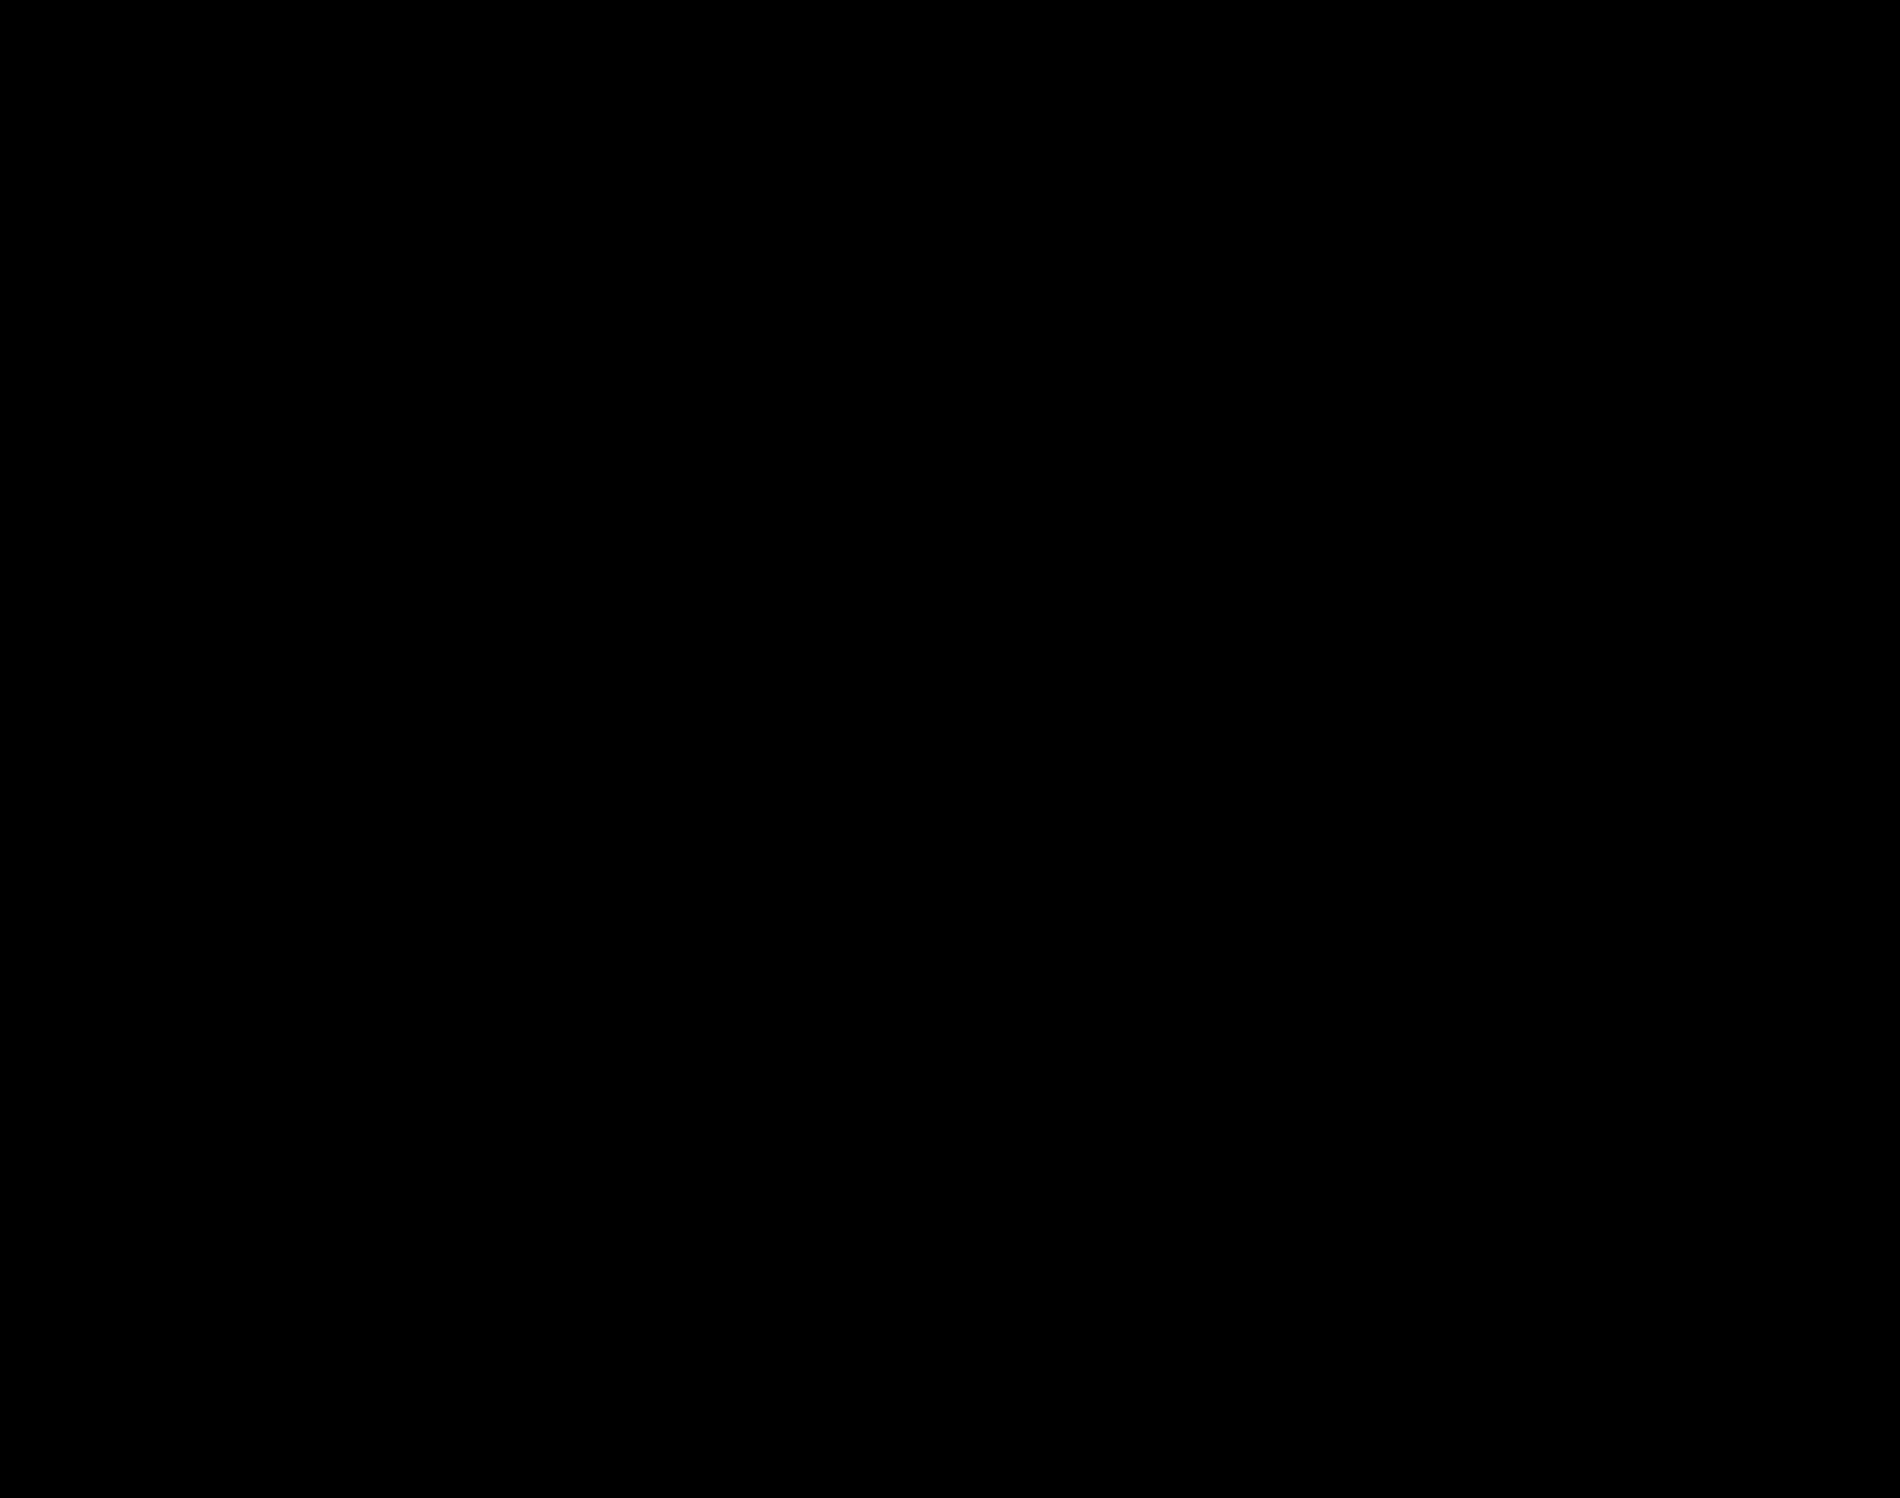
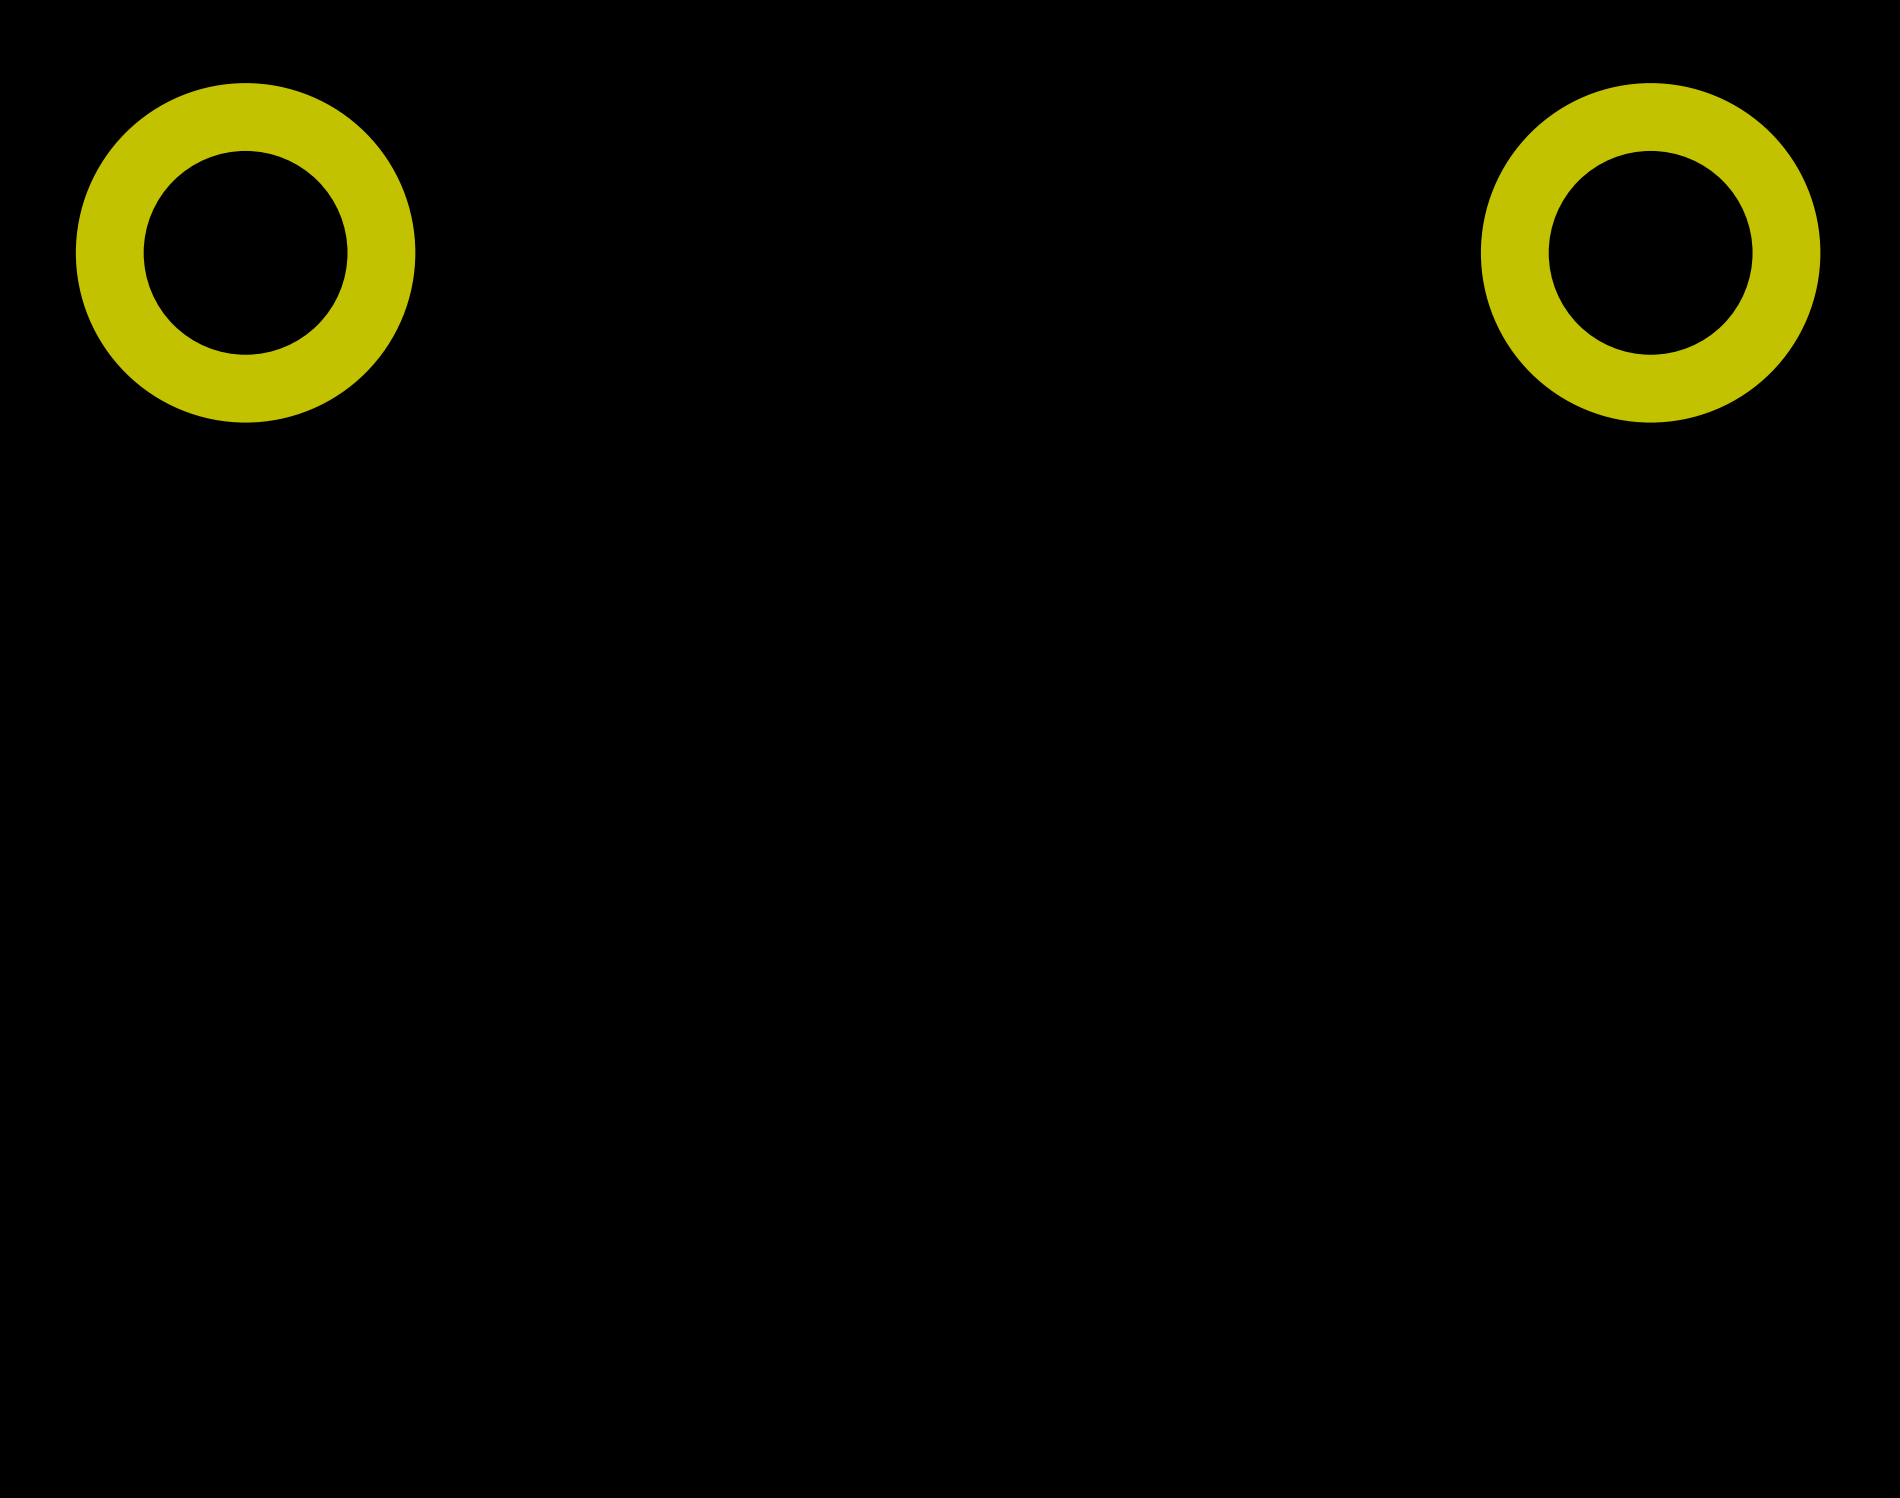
part: none -> (245, 252)
part: none -> (1650, 252)

